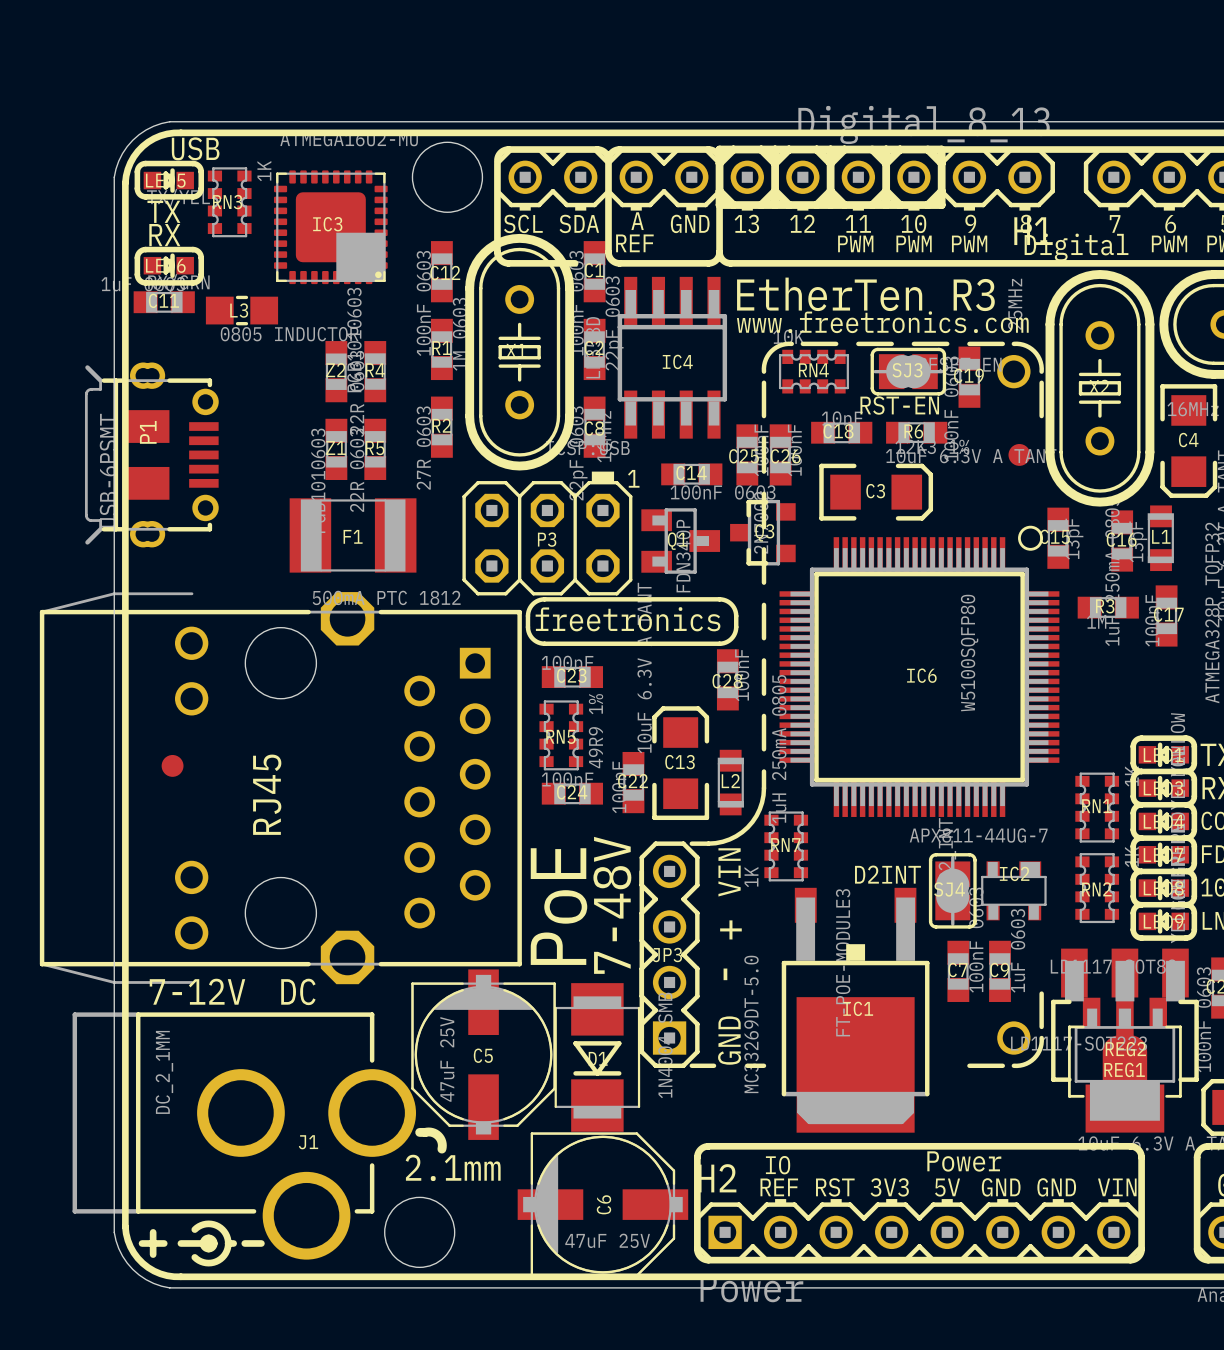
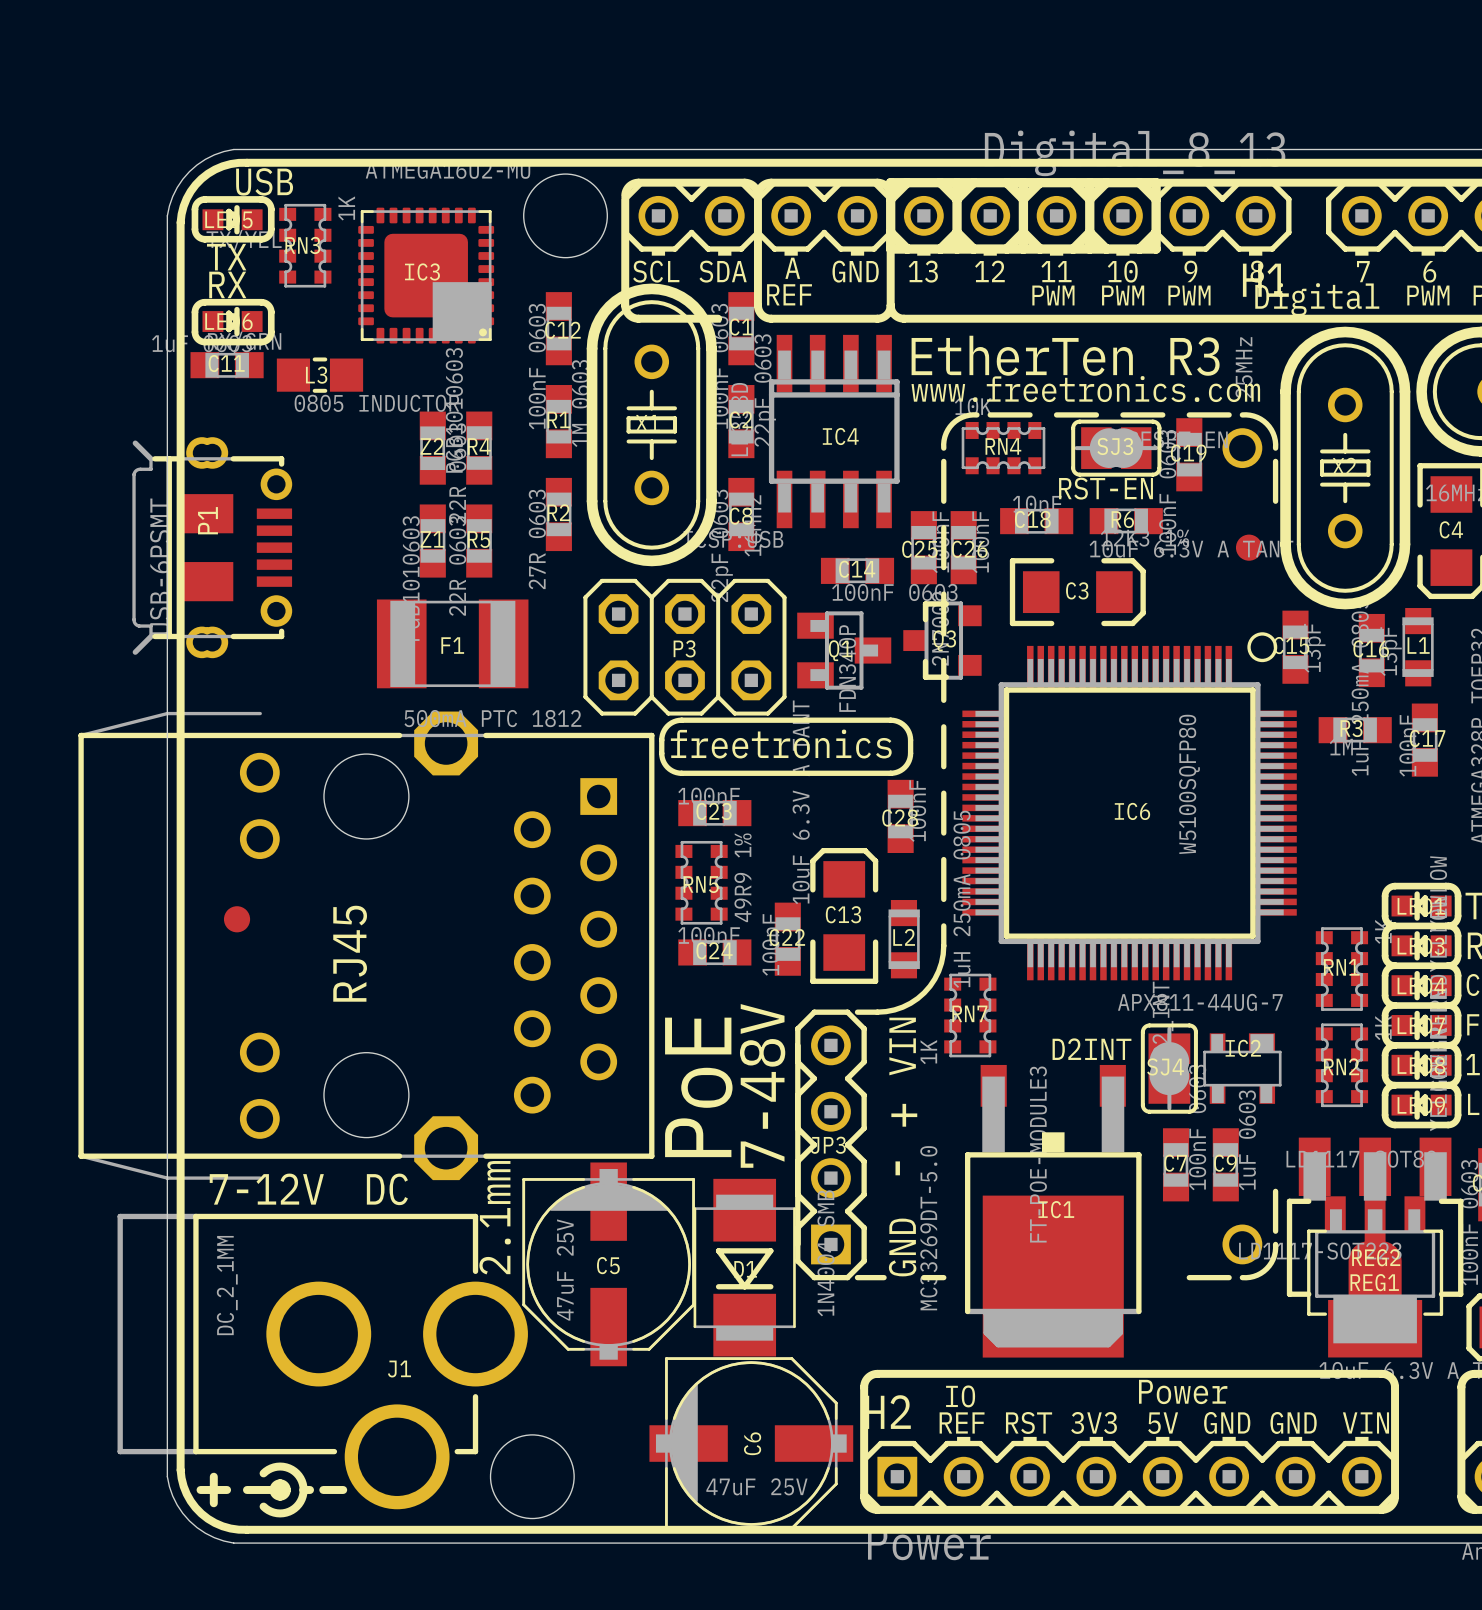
drawing: [591, 471, 615, 483] -> none
text: 1 (633, 478) -> none
line: (419, 1132) (430, 1132) (437, 1134) (441, 1140) (441, 1149) -> none
text rotation: 0° (453, 1167) -> 90° counterclockwise (495, 1217)
text position: 2.1mm (453, 1167) -> 2.1mm (495, 1217)

